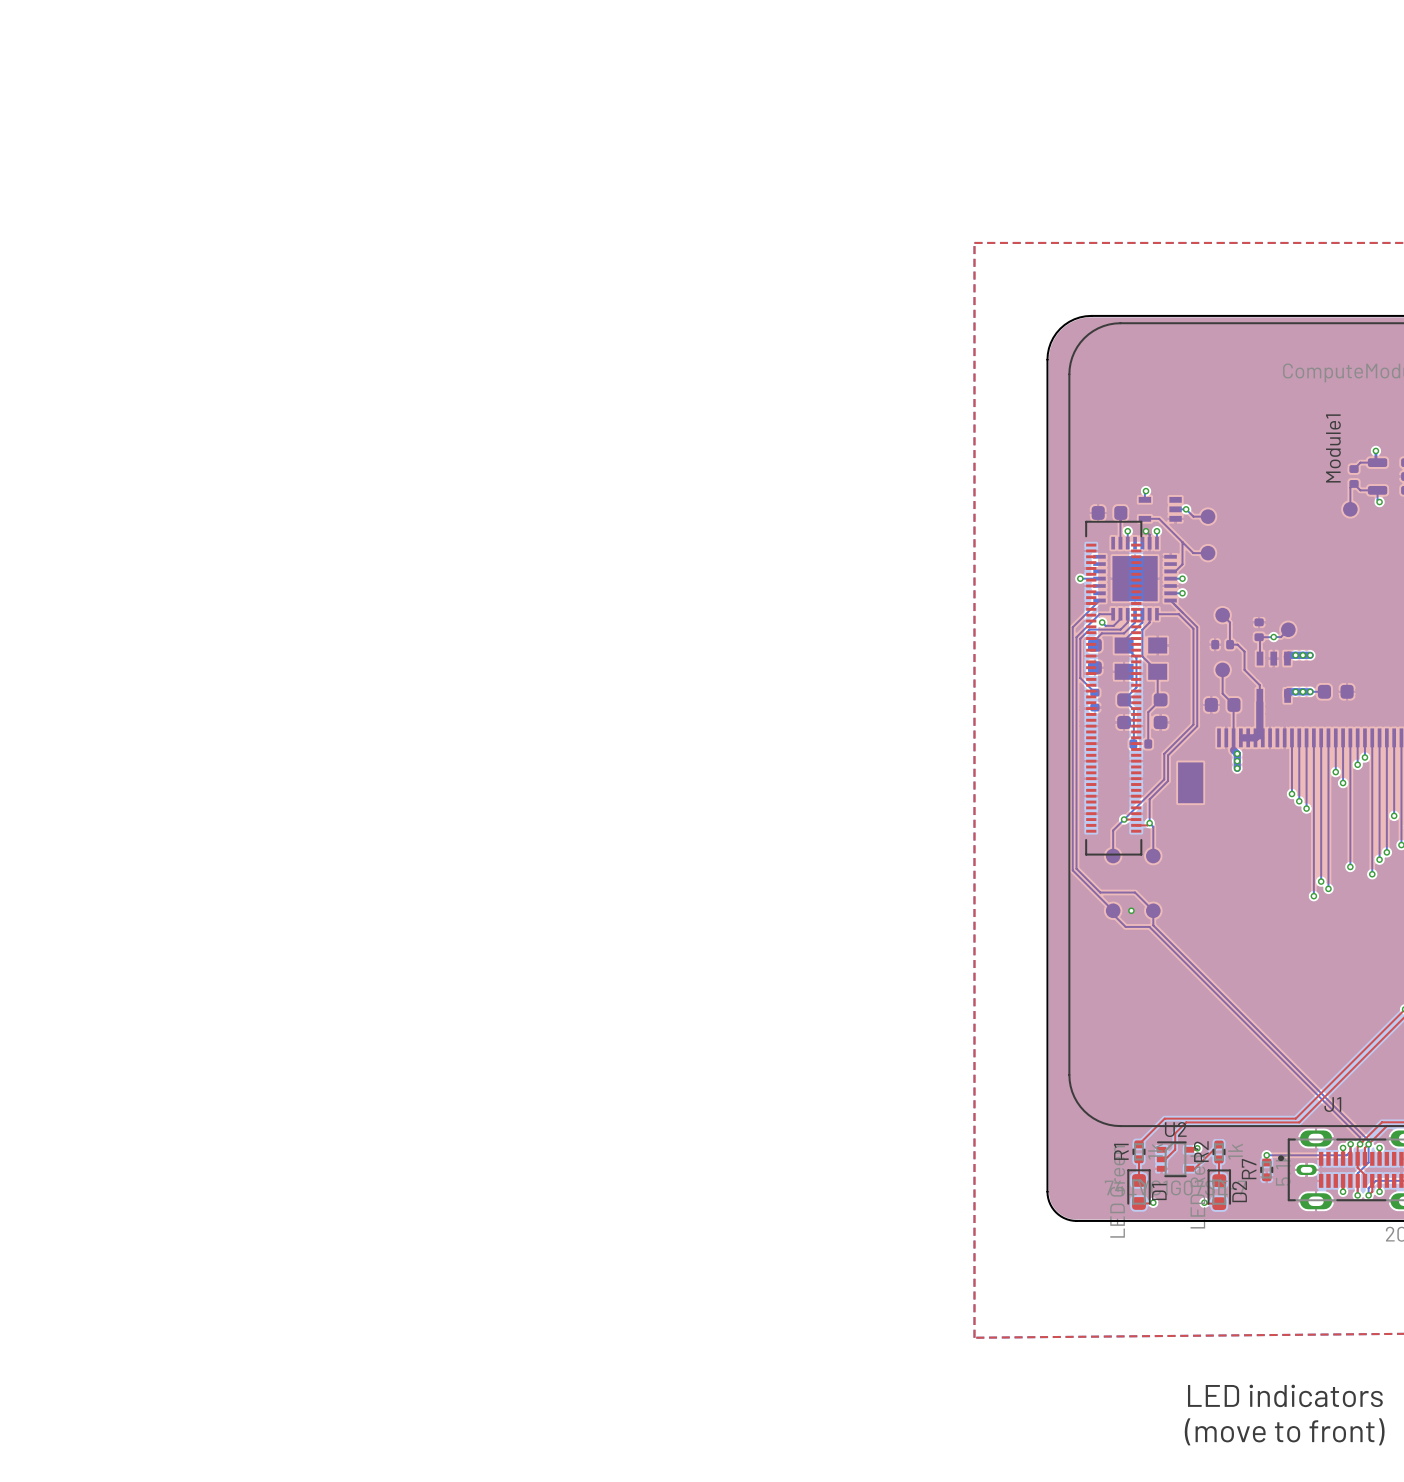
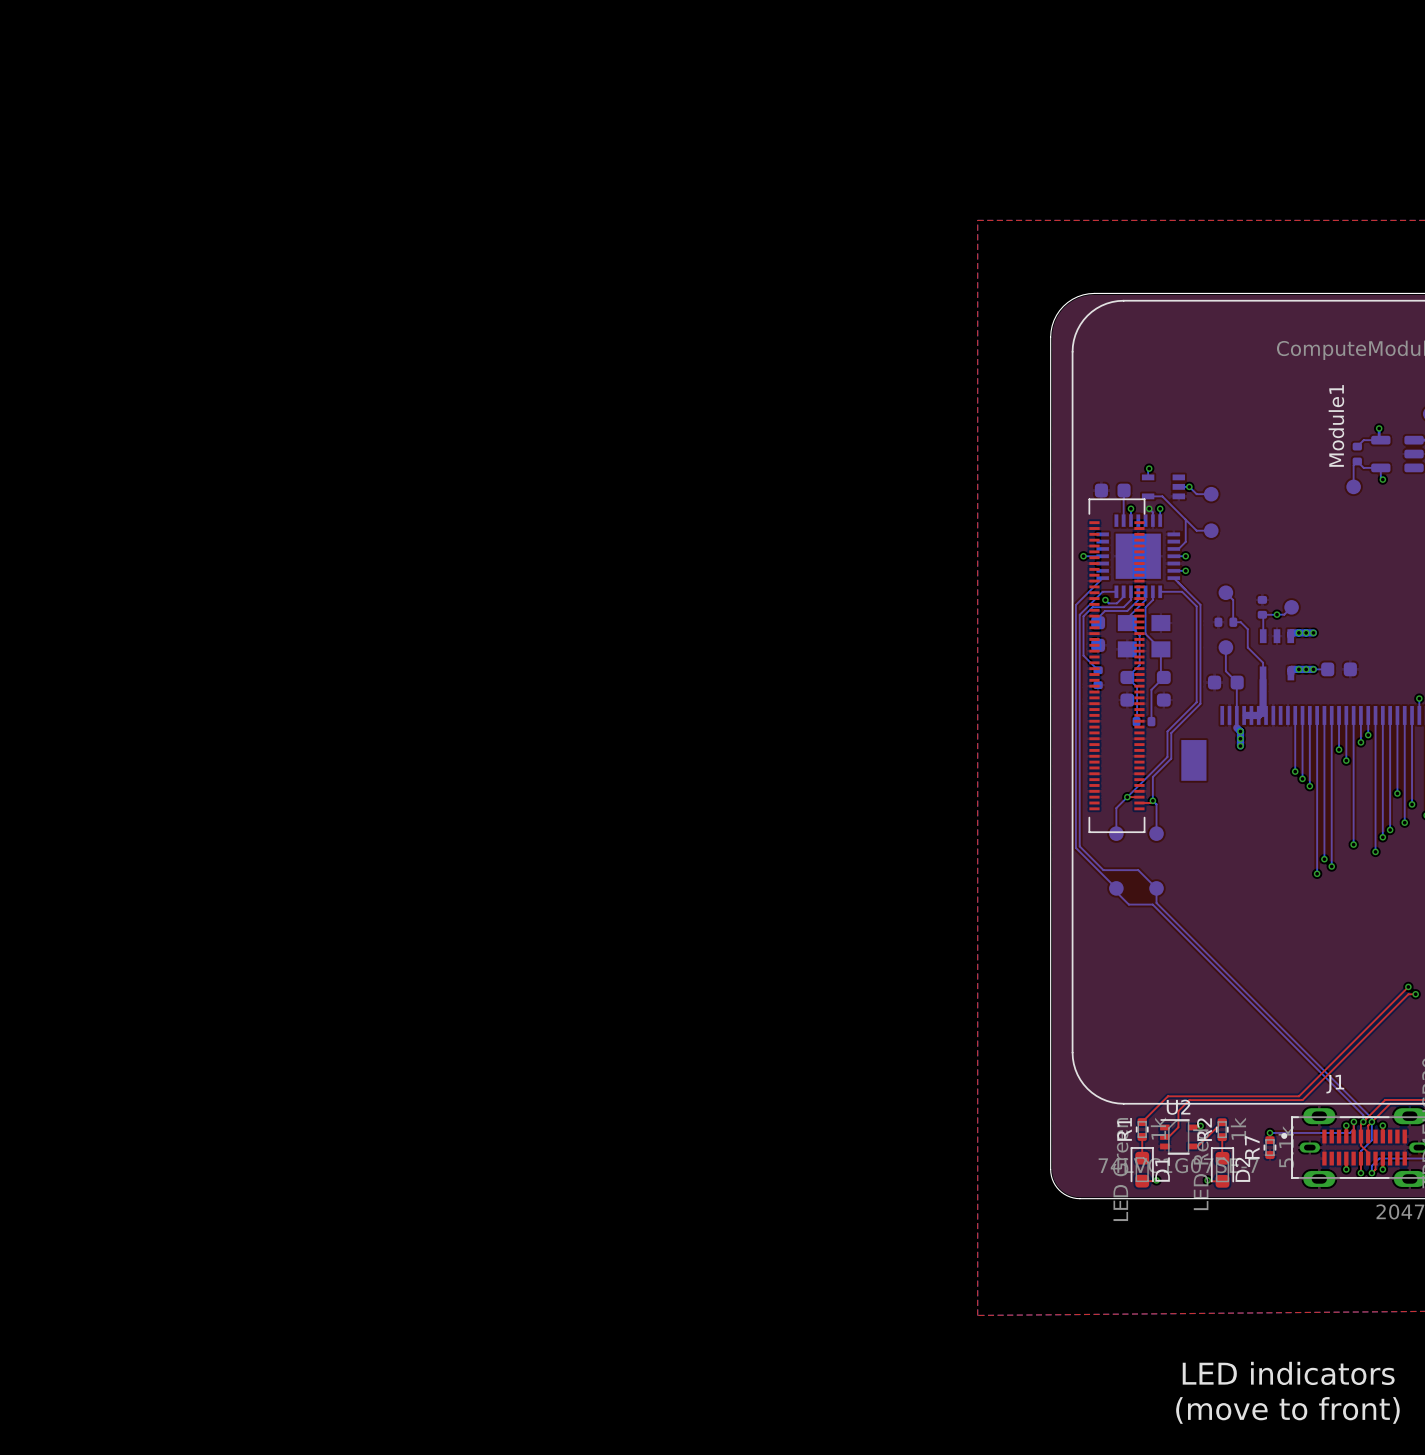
via: (1131, 910) -> none

